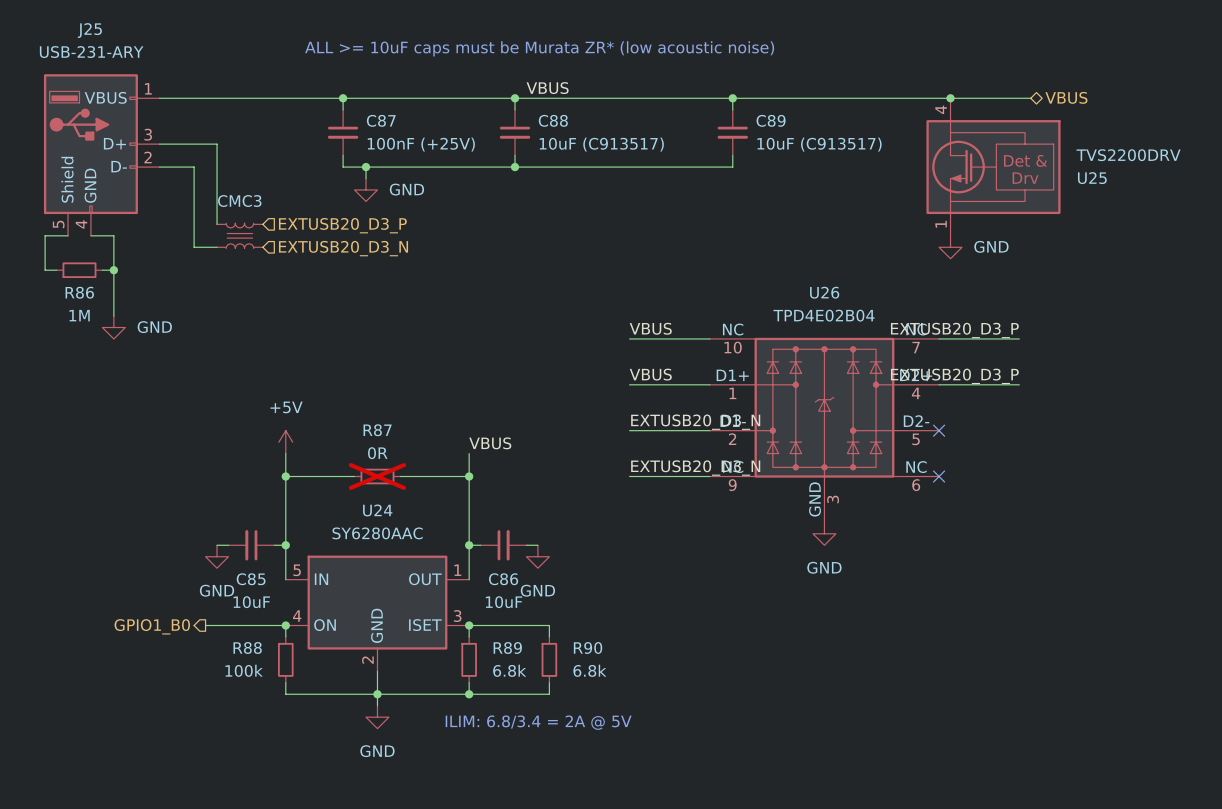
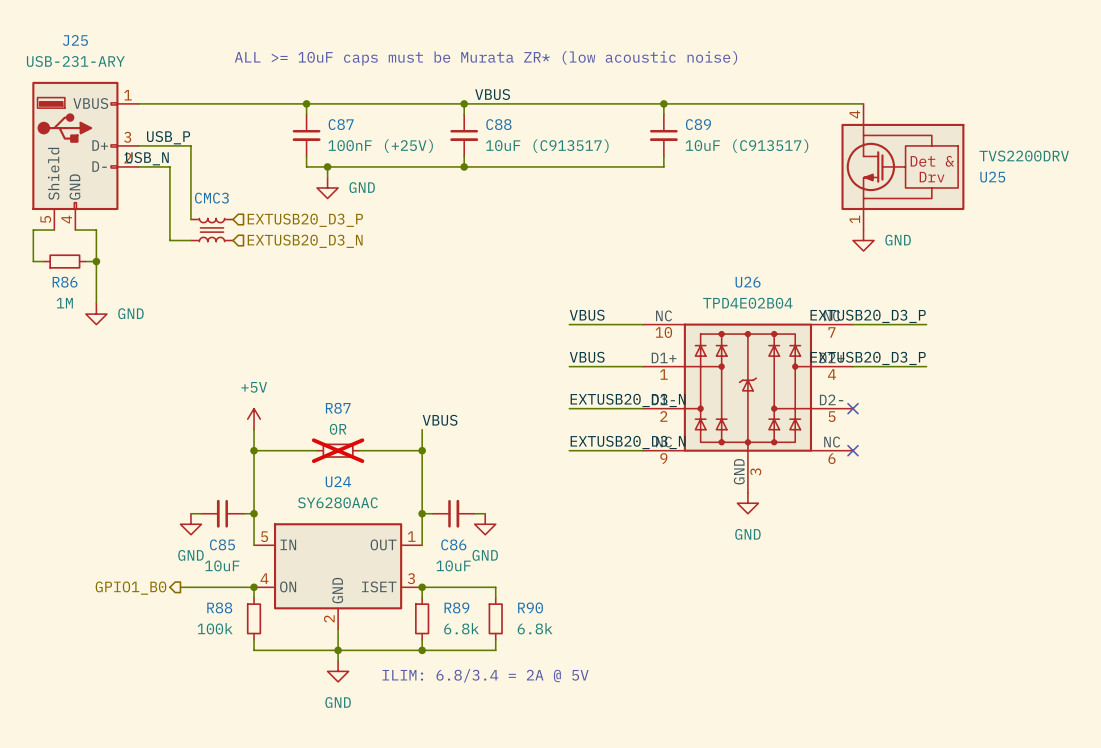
hierarchical label: VBUS (1066, 97) -> none
wire: (950, 98) (1030, 98) -> none
junction: (950, 98) -> none
label: none -> USB_P (168, 137)
label: none -> USB_N (147, 158)

